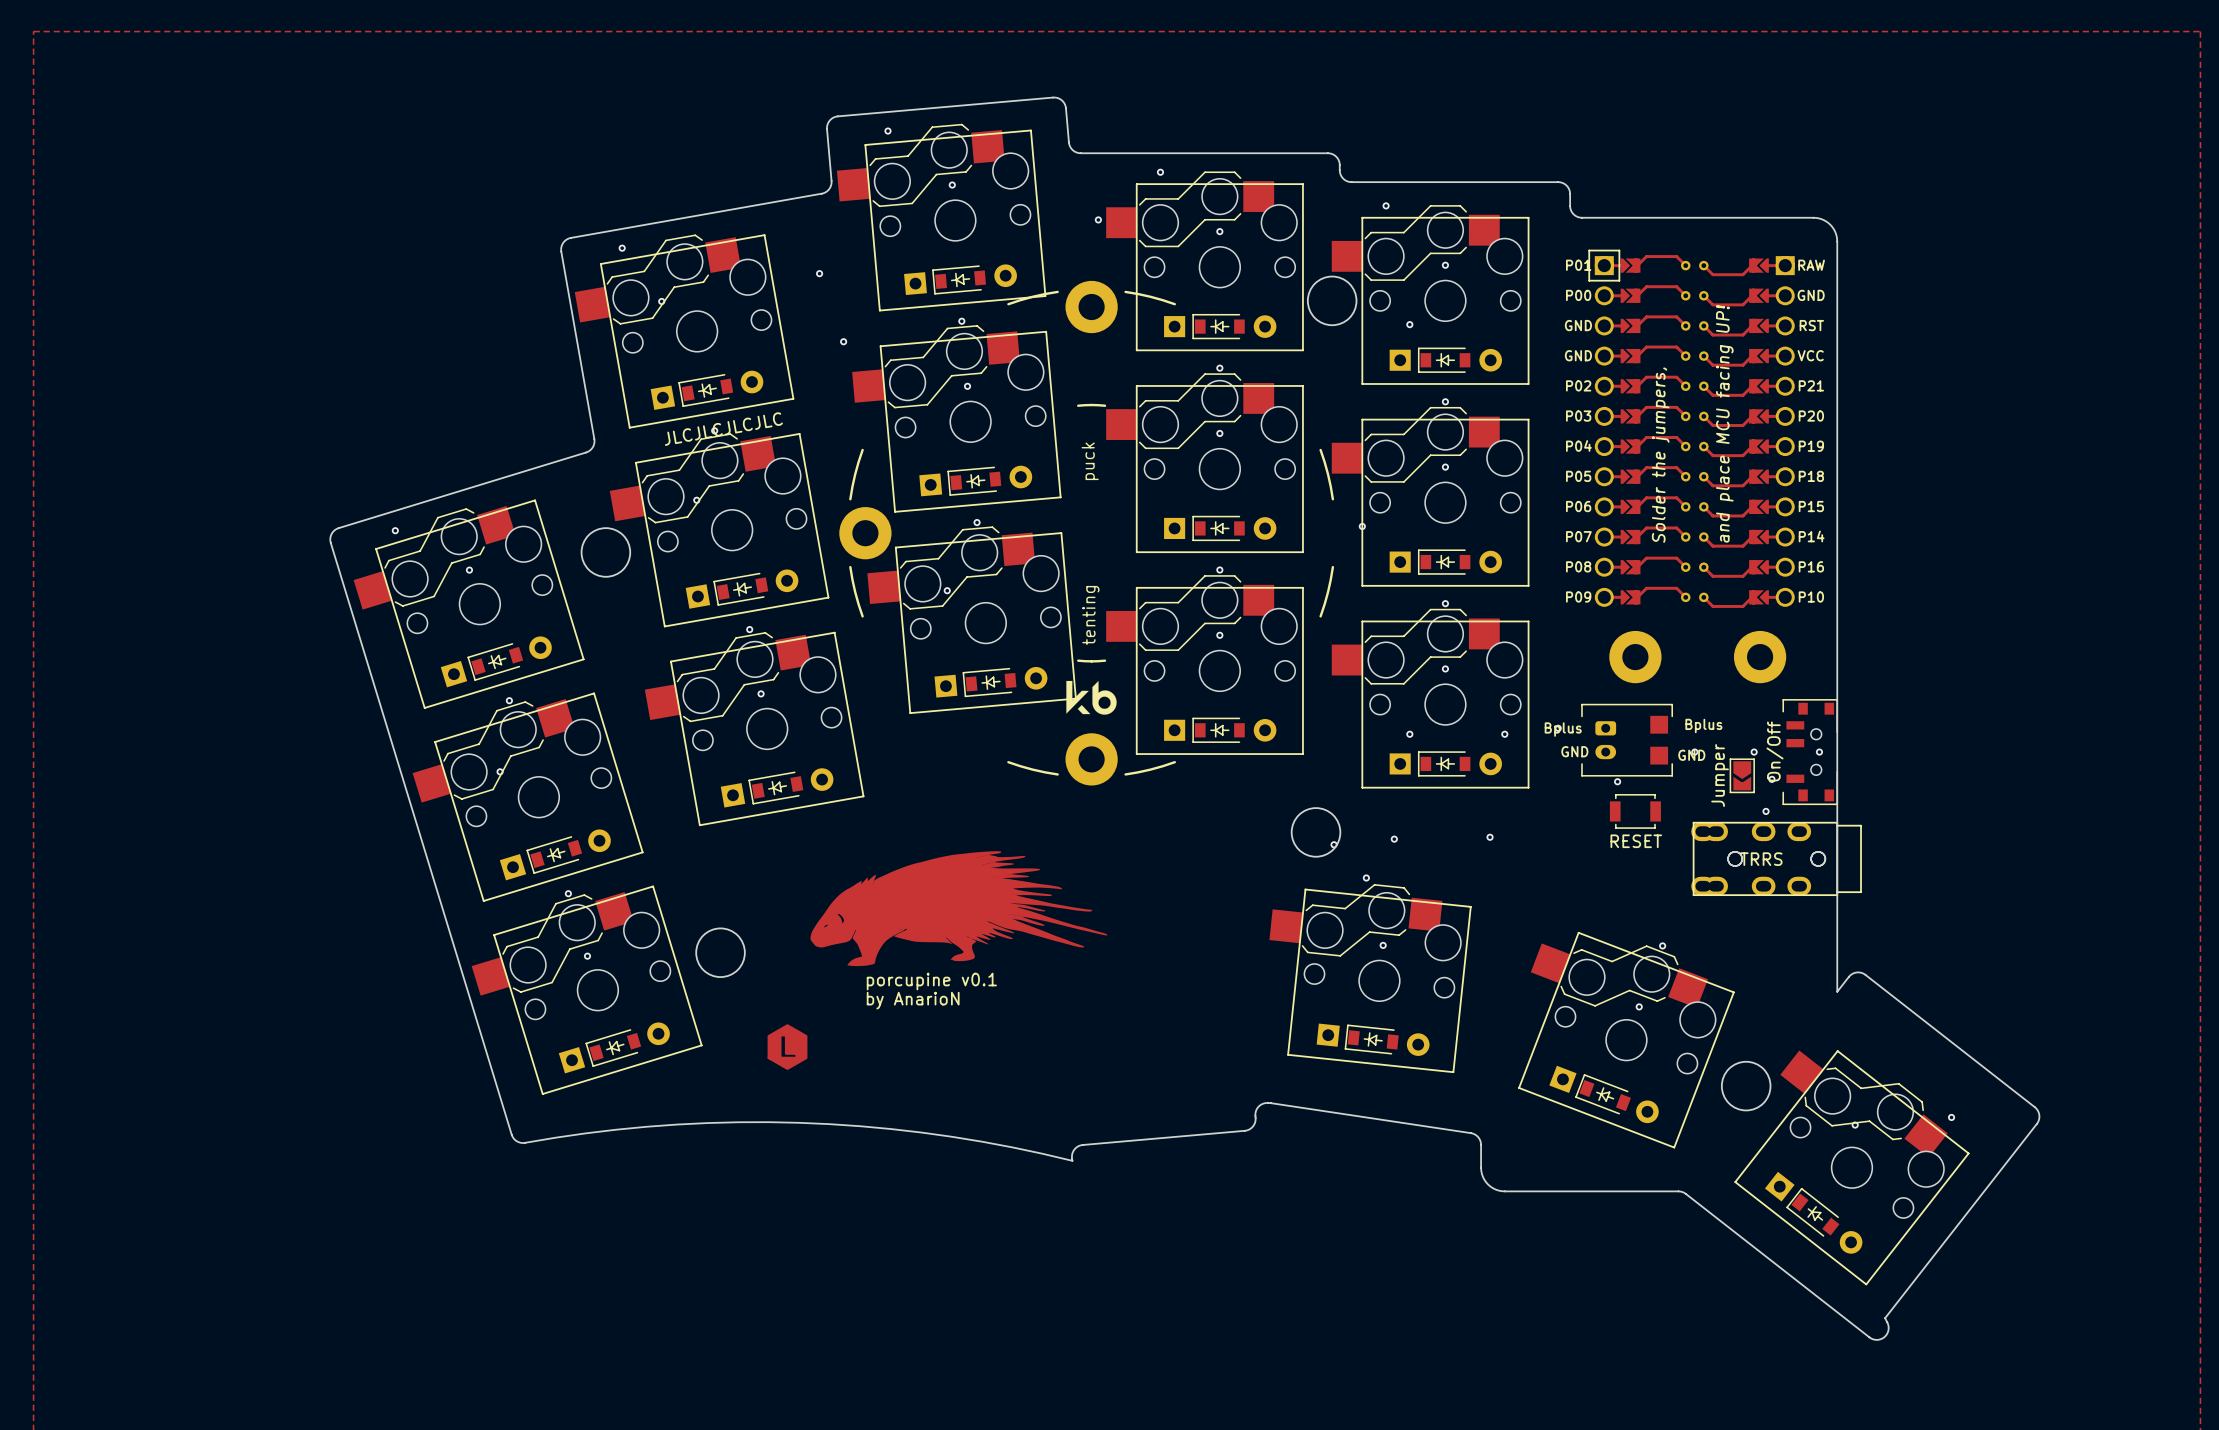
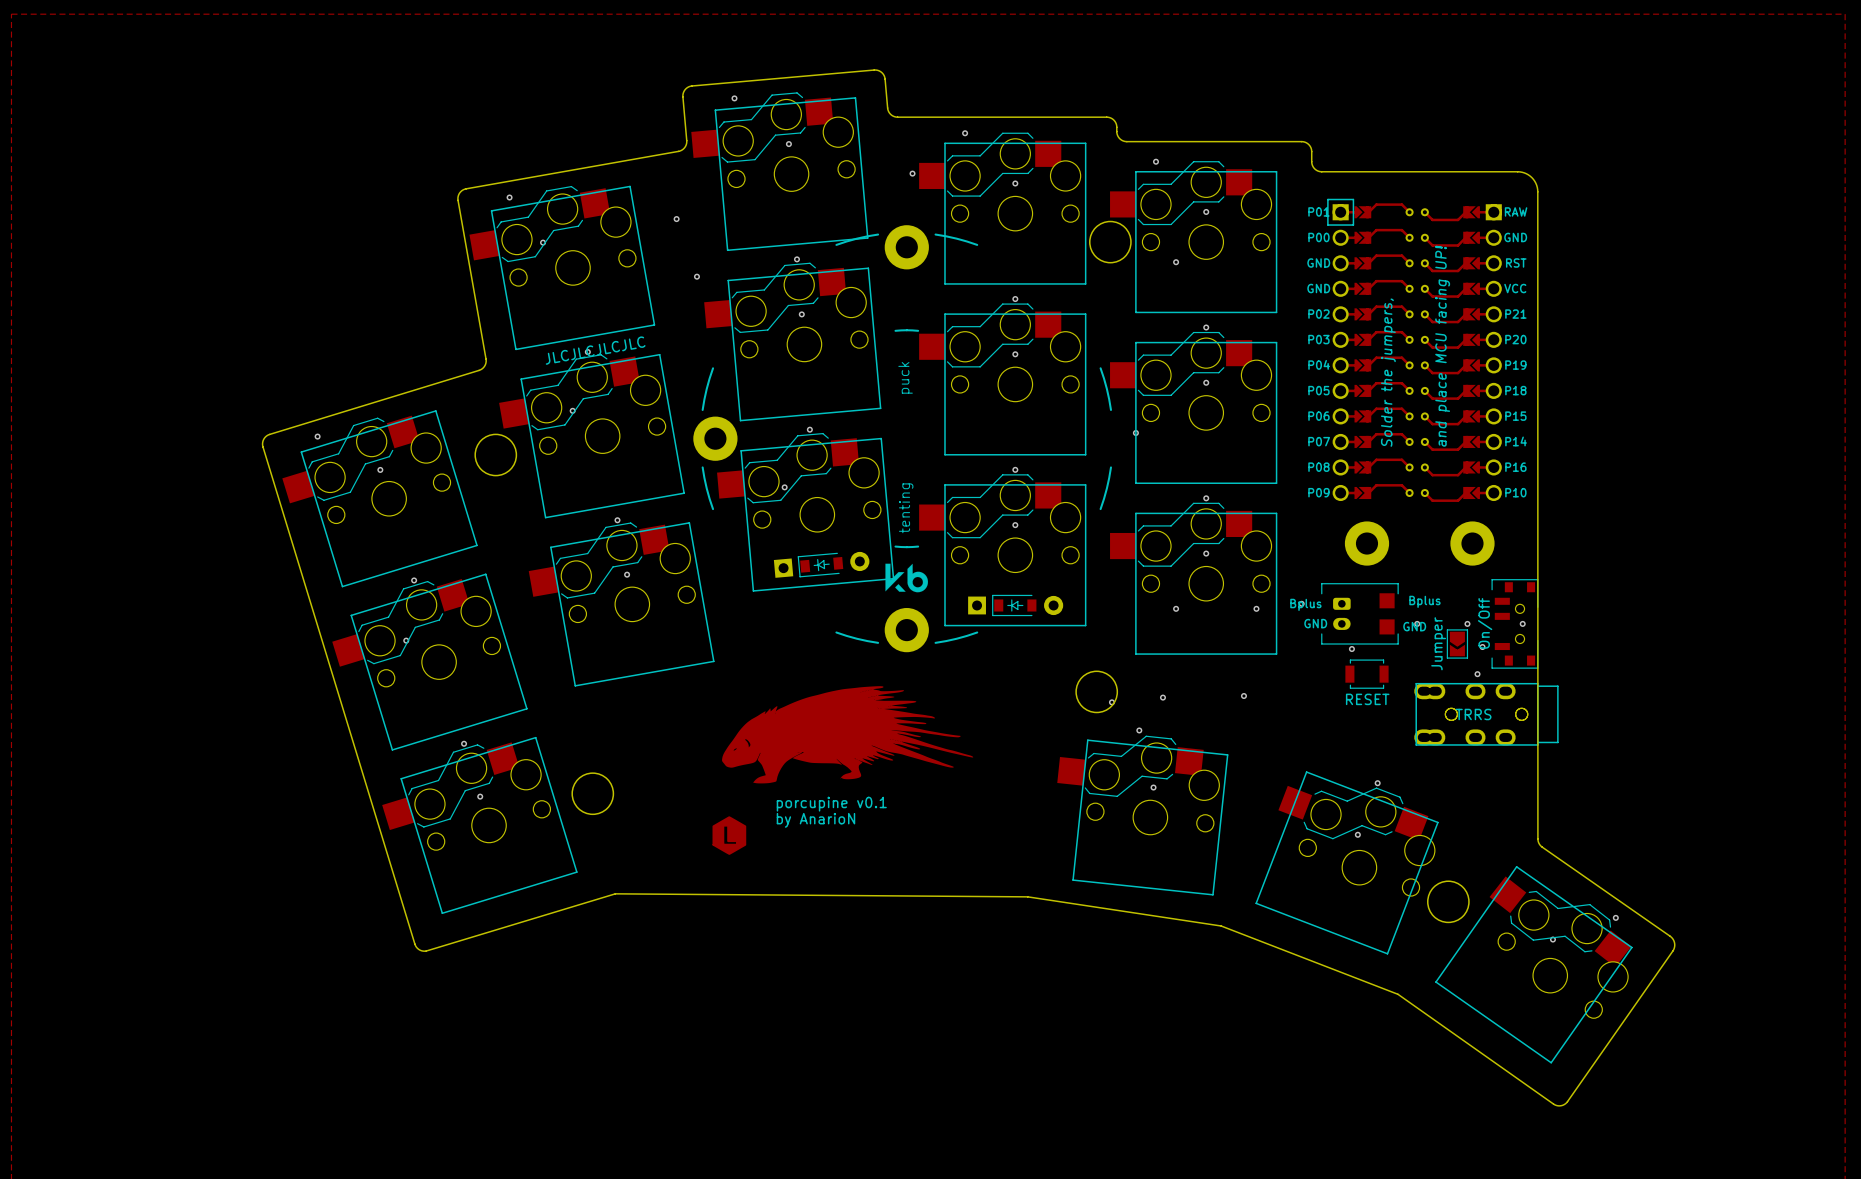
board edge: (1837, 241) (1837, 991) (1851, 974) (1858, 972) (1864, 974) (2034, 1107) (2039, 1116) (2036, 1123) (1885, 1318) (1888, 1331) (1885, 1336) (1879, 1339) (1869, 1337) (1682, 1192) (1498, 1190) (1490, 1186) (1482, 1176) (1480, 1142) (1473, 1133) (1271, 1103) (1263, 1103) (1258, 1106) (1255, 1111) (1254, 1124) (1246, 1130) (1081, 1145) (1073, 1150) (1072, 1160) (952, 1136) (891, 1129) (799, 1122) (677, 1124) (616, 1129) (523, 1142) (518, 1141) (511, 1134) (330, 542) -> (1537, 191) (1538, 841) (1542, 847) (1670, 936) (1674, 944) (1672, 951) (1567, 1101) (1561, 1105) (1553, 1104) (1398, 994) (1221, 926) (1027, 896) (615, 893) (426, 951) (420, 950) (414, 944) (262, 446)
part: (960, 279) -> none
part: (1220, 326) -> none
part: (1445, 360) -> none
part: (706, 390) -> none
part: (975, 481) -> none
part: (1220, 528) -> none
part: (1445, 562) -> none
part: (742, 589) -> none
part: (496, 661) -> none
part: (1445, 763) -> none
part: (777, 787) -> none
part: (555, 854) -> none
drawing position: (958, 908) -> (847, 734)
line: (1578, 932) (1519, 1087) (1674, 1147) (1733, 992) (1578, 932) -> (1306, 772) (1256, 903) (1387, 953) (1437, 822) (1306, 772)
via position: (1662, 945) -> (1377, 783)
text position: porcupine v0.1 (931, 981) -> porcupine v0.1 (831, 804)
text position: by AnarioN (913, 1000) -> by AnarioN (815, 820)
via position: (1639, 1006) -> (1357, 834)
part: (1373, 1039) -> none
part: (614, 1047) -> none
drawing position: (787, 1047) -> (729, 835)
line: (1837, 1051) (1735, 1182) (1866, 1284) (1968, 1153) (1837, 1051) -> (1516, 866) (1435, 982) (1551, 1062) (1631, 947) (1516, 866)
round board edge position: (1746, 1086) -> (1448, 901)
part: (1604, 1094) -> none
via position: (1951, 1117) -> (1615, 917)
part: (1813, 1212) -> none

